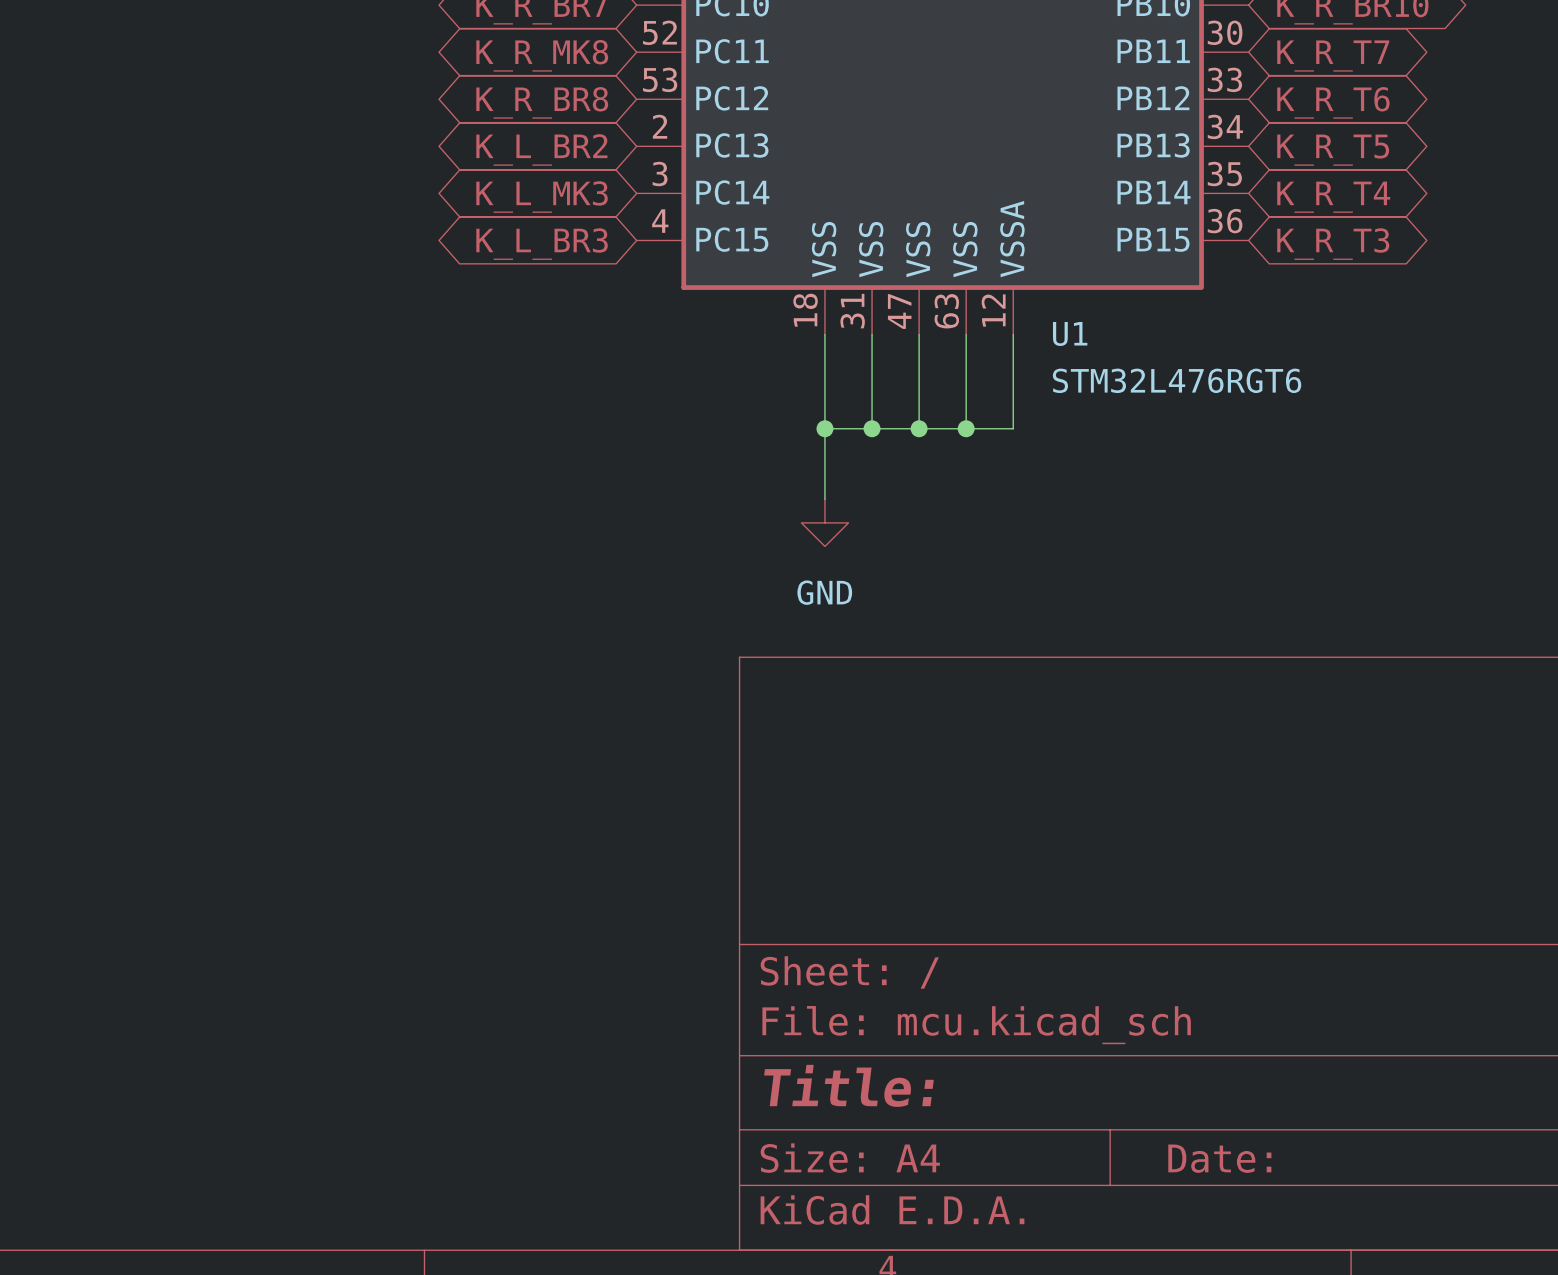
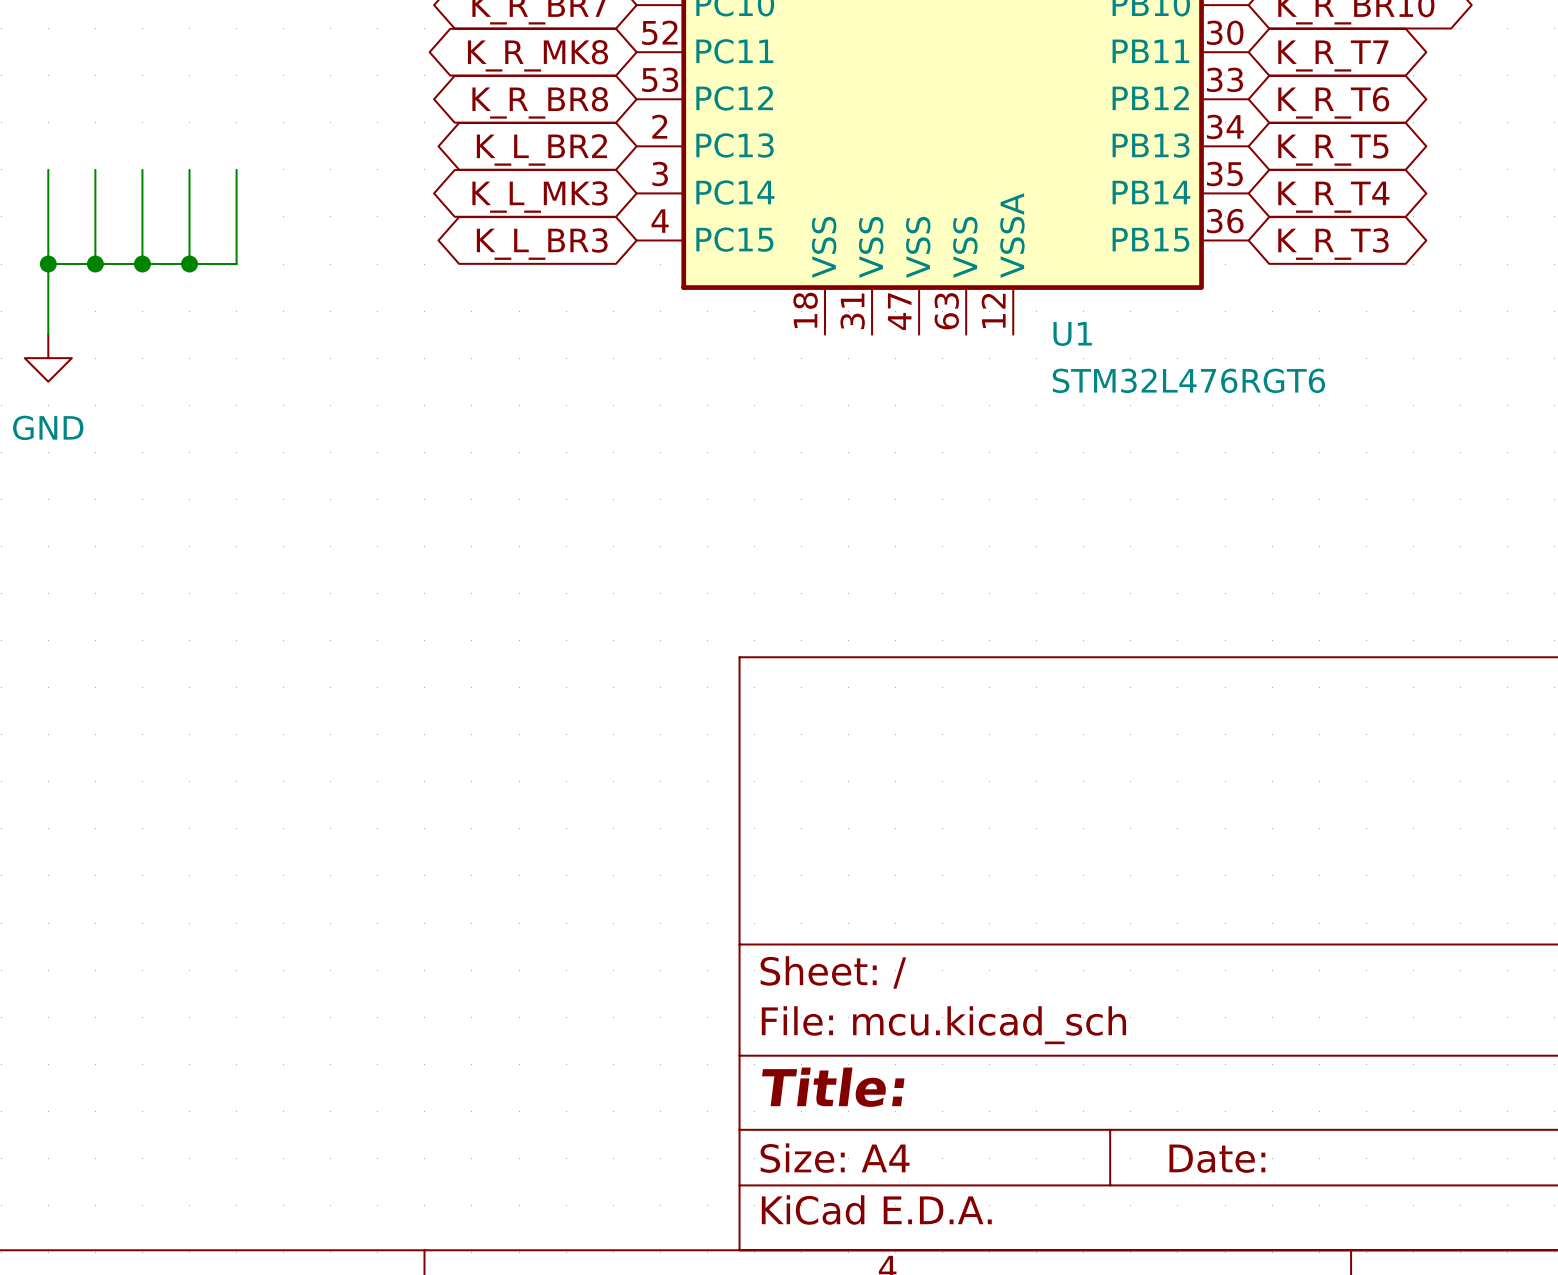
wire: none -> (48, 169) (48, 334)
wire: none -> (95, 169) (95, 264)
wire: none -> (142, 169) (142, 264)
wire: none -> (189, 169) (189, 264)
wire: none -> (236, 169) (236, 264) (48, 264)
junction: none -> (48, 264)
junction: none -> (95, 264)
junction: none -> (142, 264)
junction: none -> (189, 264)
wire: (824, 334) (824, 499) -> none
wire: (872, 334) (872, 428) -> none
wire: (919, 334) (919, 428) -> none
wire: (966, 334) (966, 428) -> none
wire: (1013, 334) (1013, 428) (824, 428) -> none
power symbol: none -> GND (48, 358)
junction: (824, 428) -> none
junction: (872, 428) -> none
junction: (919, 428) -> none
junction: (966, 428) -> none
power symbol: GND (824, 522) -> none

